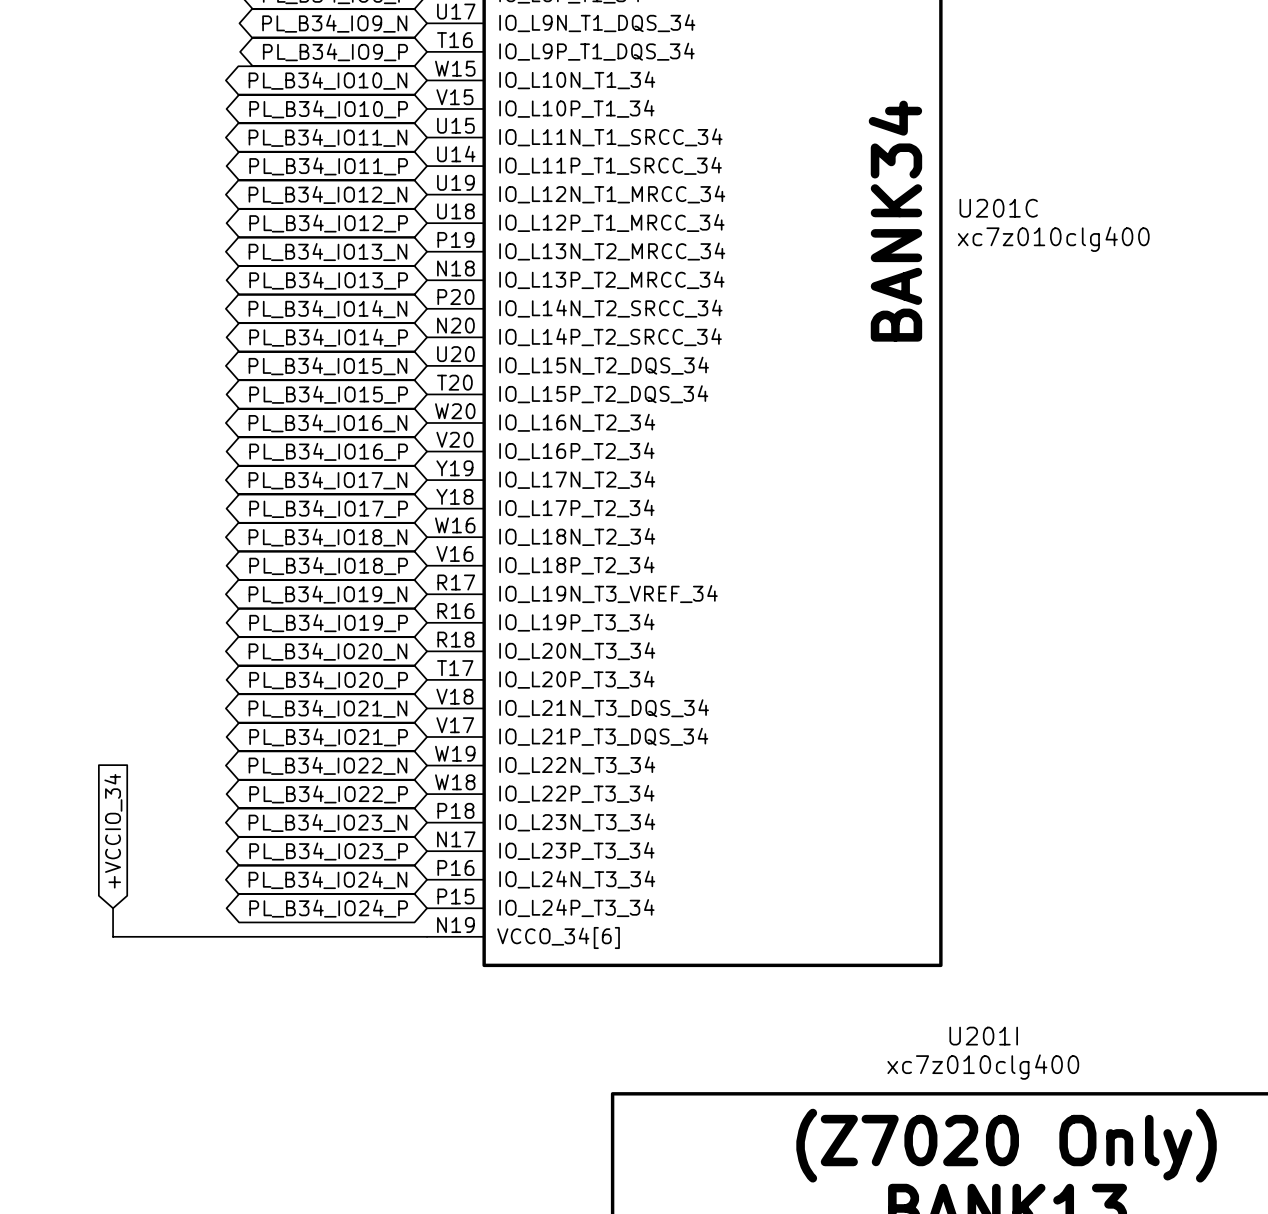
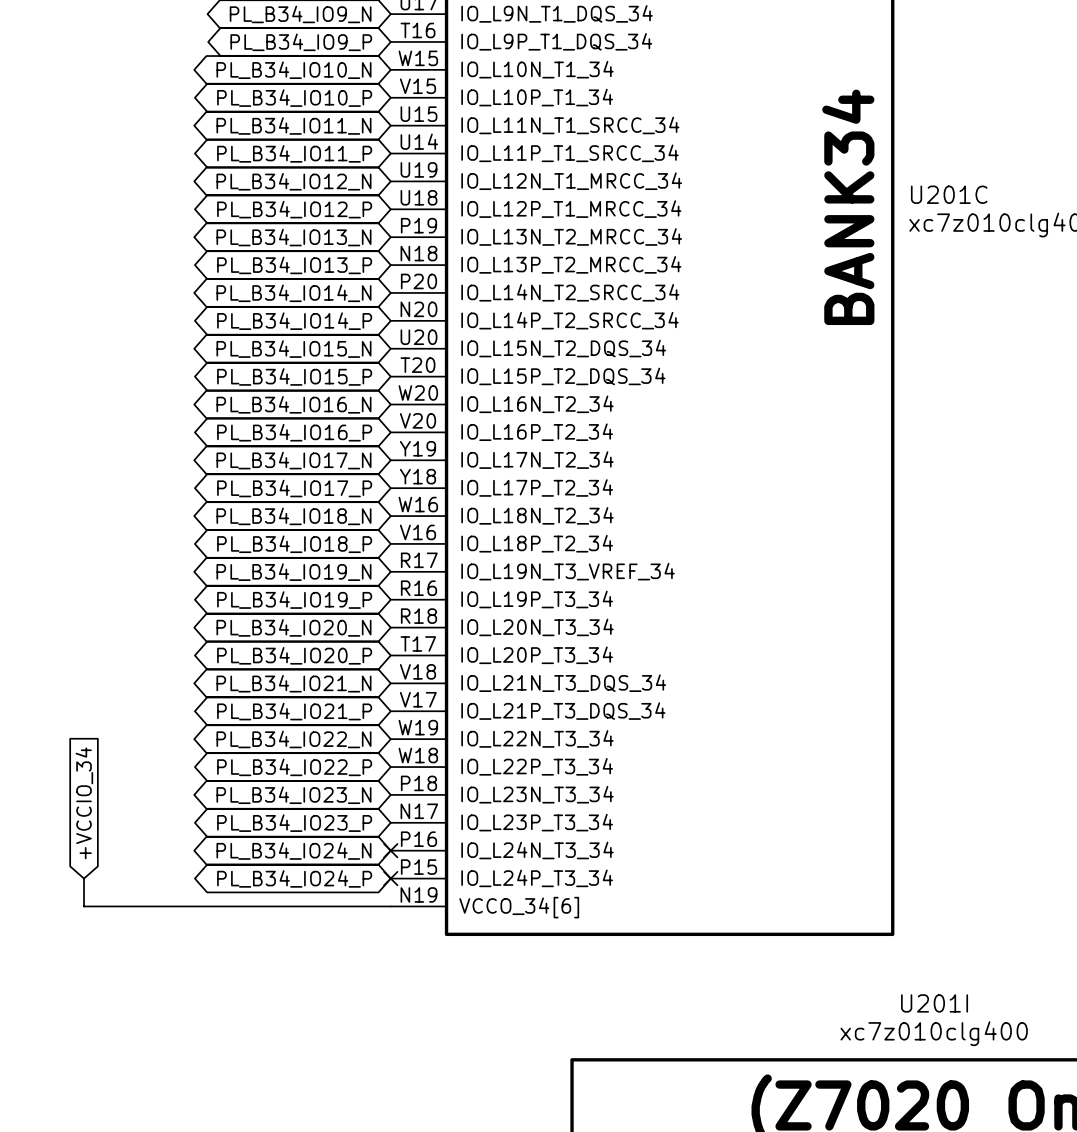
no-connect mark: none -> (390, 850)
no-connect mark: none -> (390, 878)

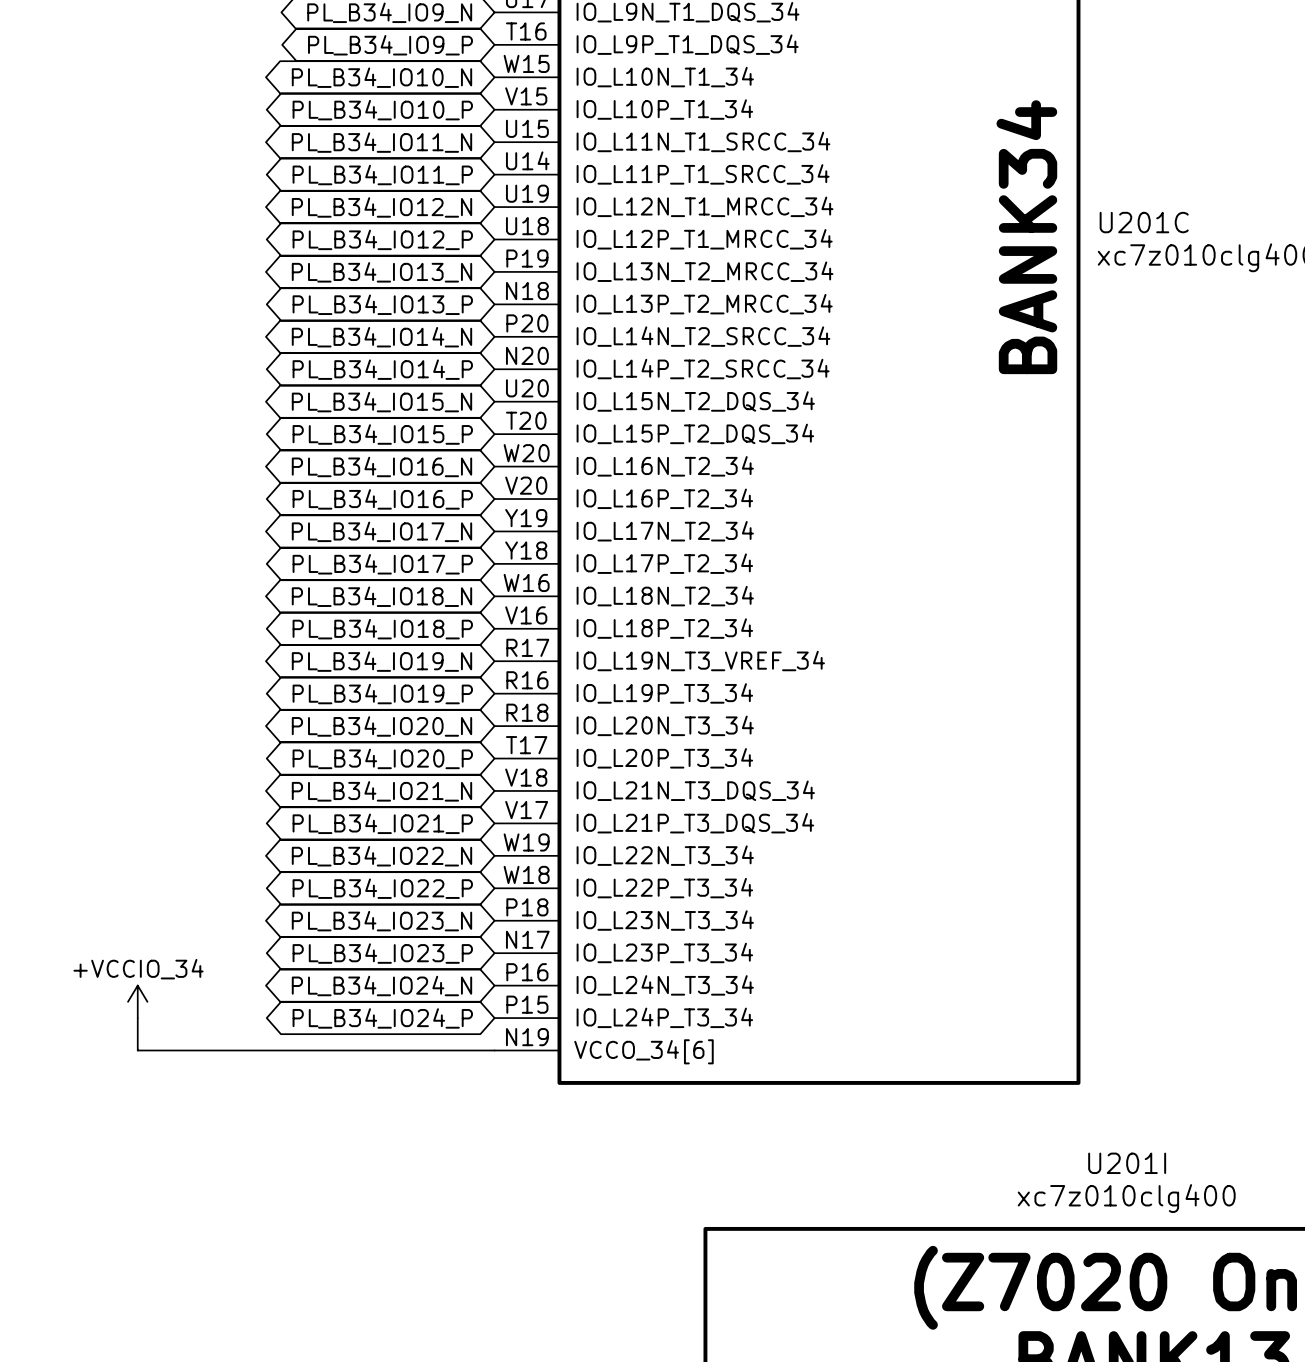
global label: +VCCIO_34 (84, 803) -> none
no-connect mark: (390, 850) -> none
power symbol: none -> +VCCIO_34 (137, 1001)
no-connect mark: (390, 878) -> none

